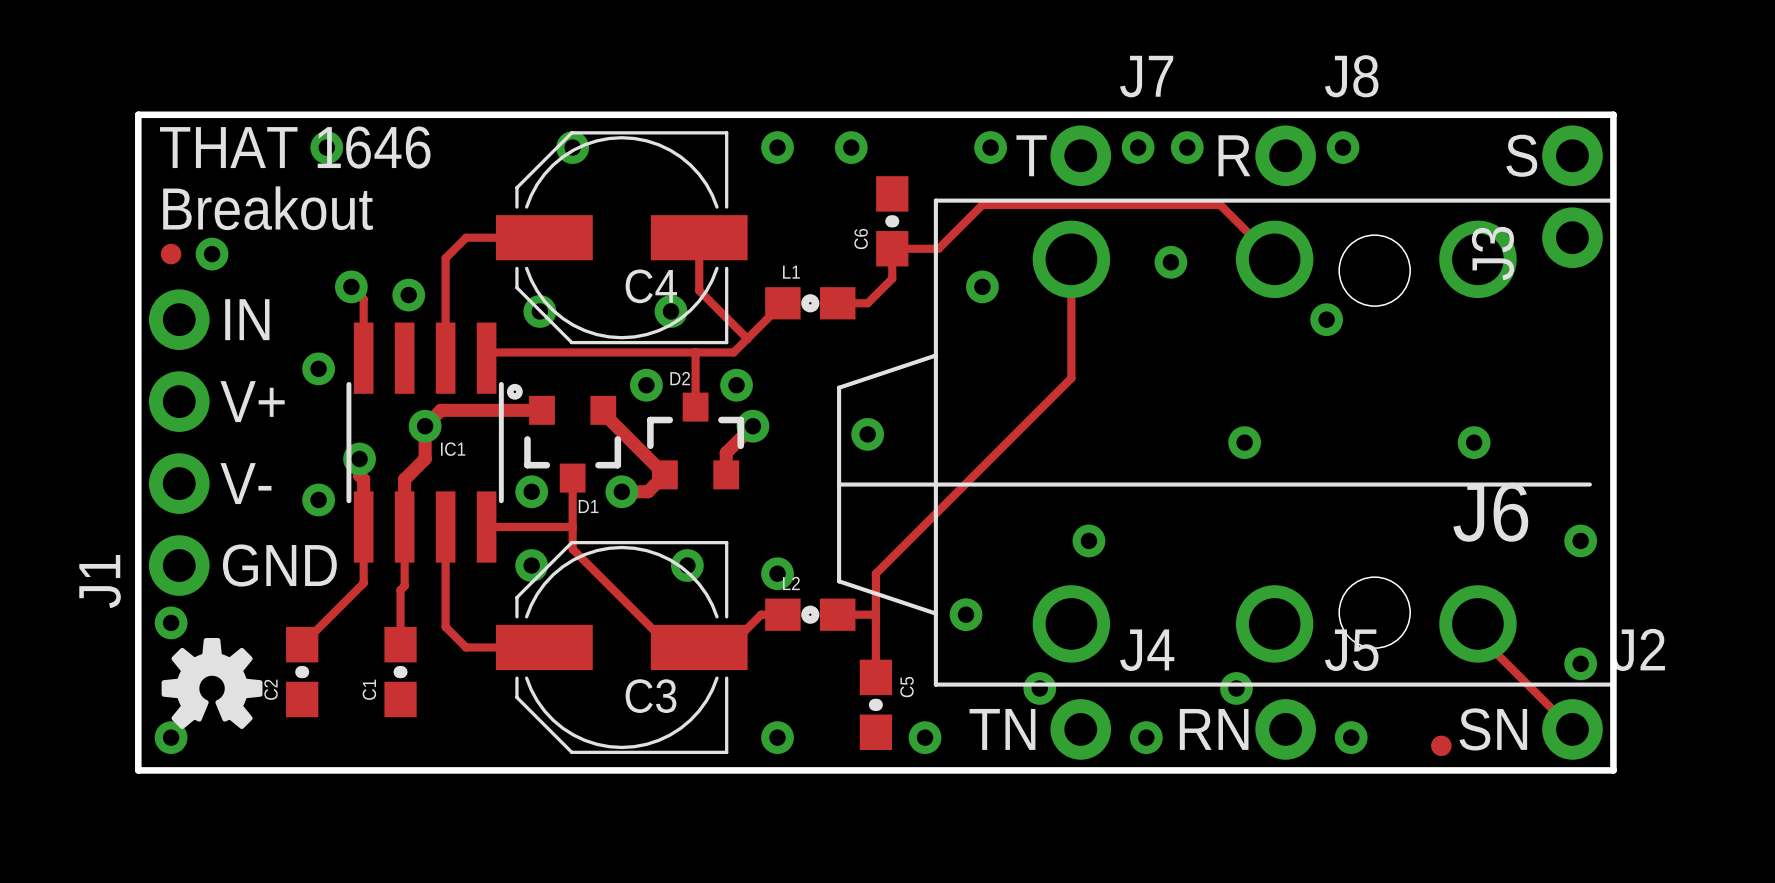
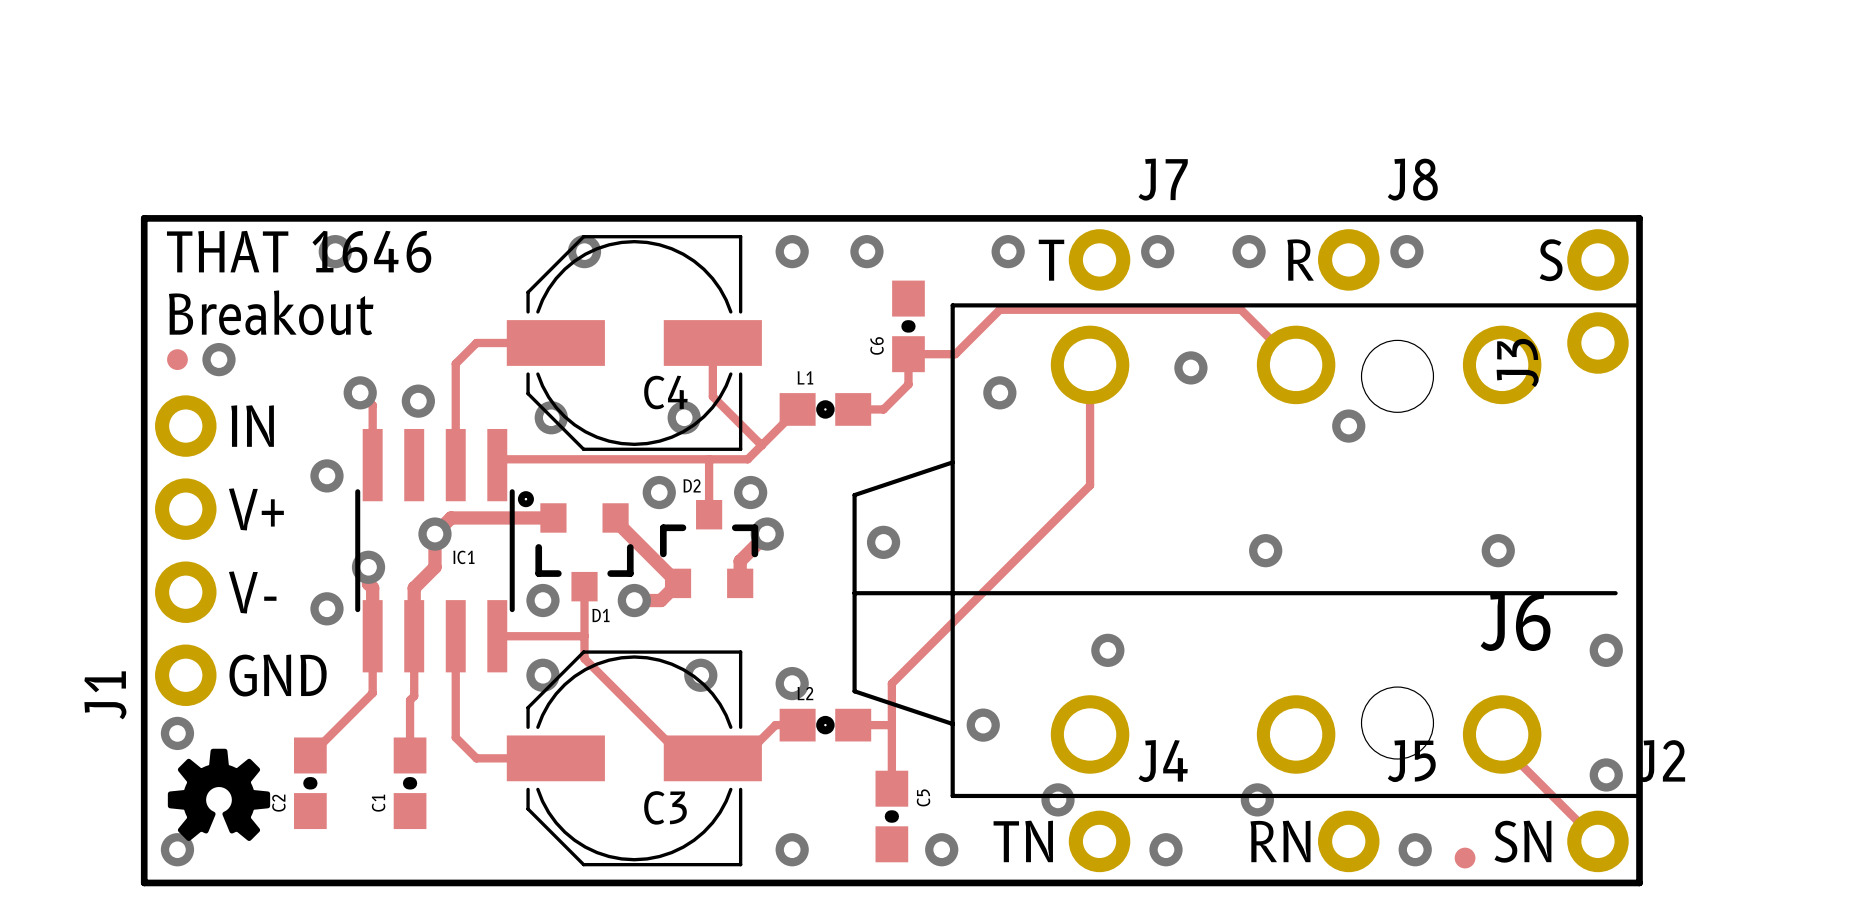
via position: (1187, 147) -> (1249, 251)
via position: (1343, 147) -> (1406, 251)
text position: R (1234, 155) -> R (1300, 260)
J8 position: (1285, 155) -> (1348, 259)
text position: RN (1214, 729) -> RN (1280, 841)
J5 position: (1285, 729) -> (1348, 841)
via position: (1351, 737) -> (1415, 849)

